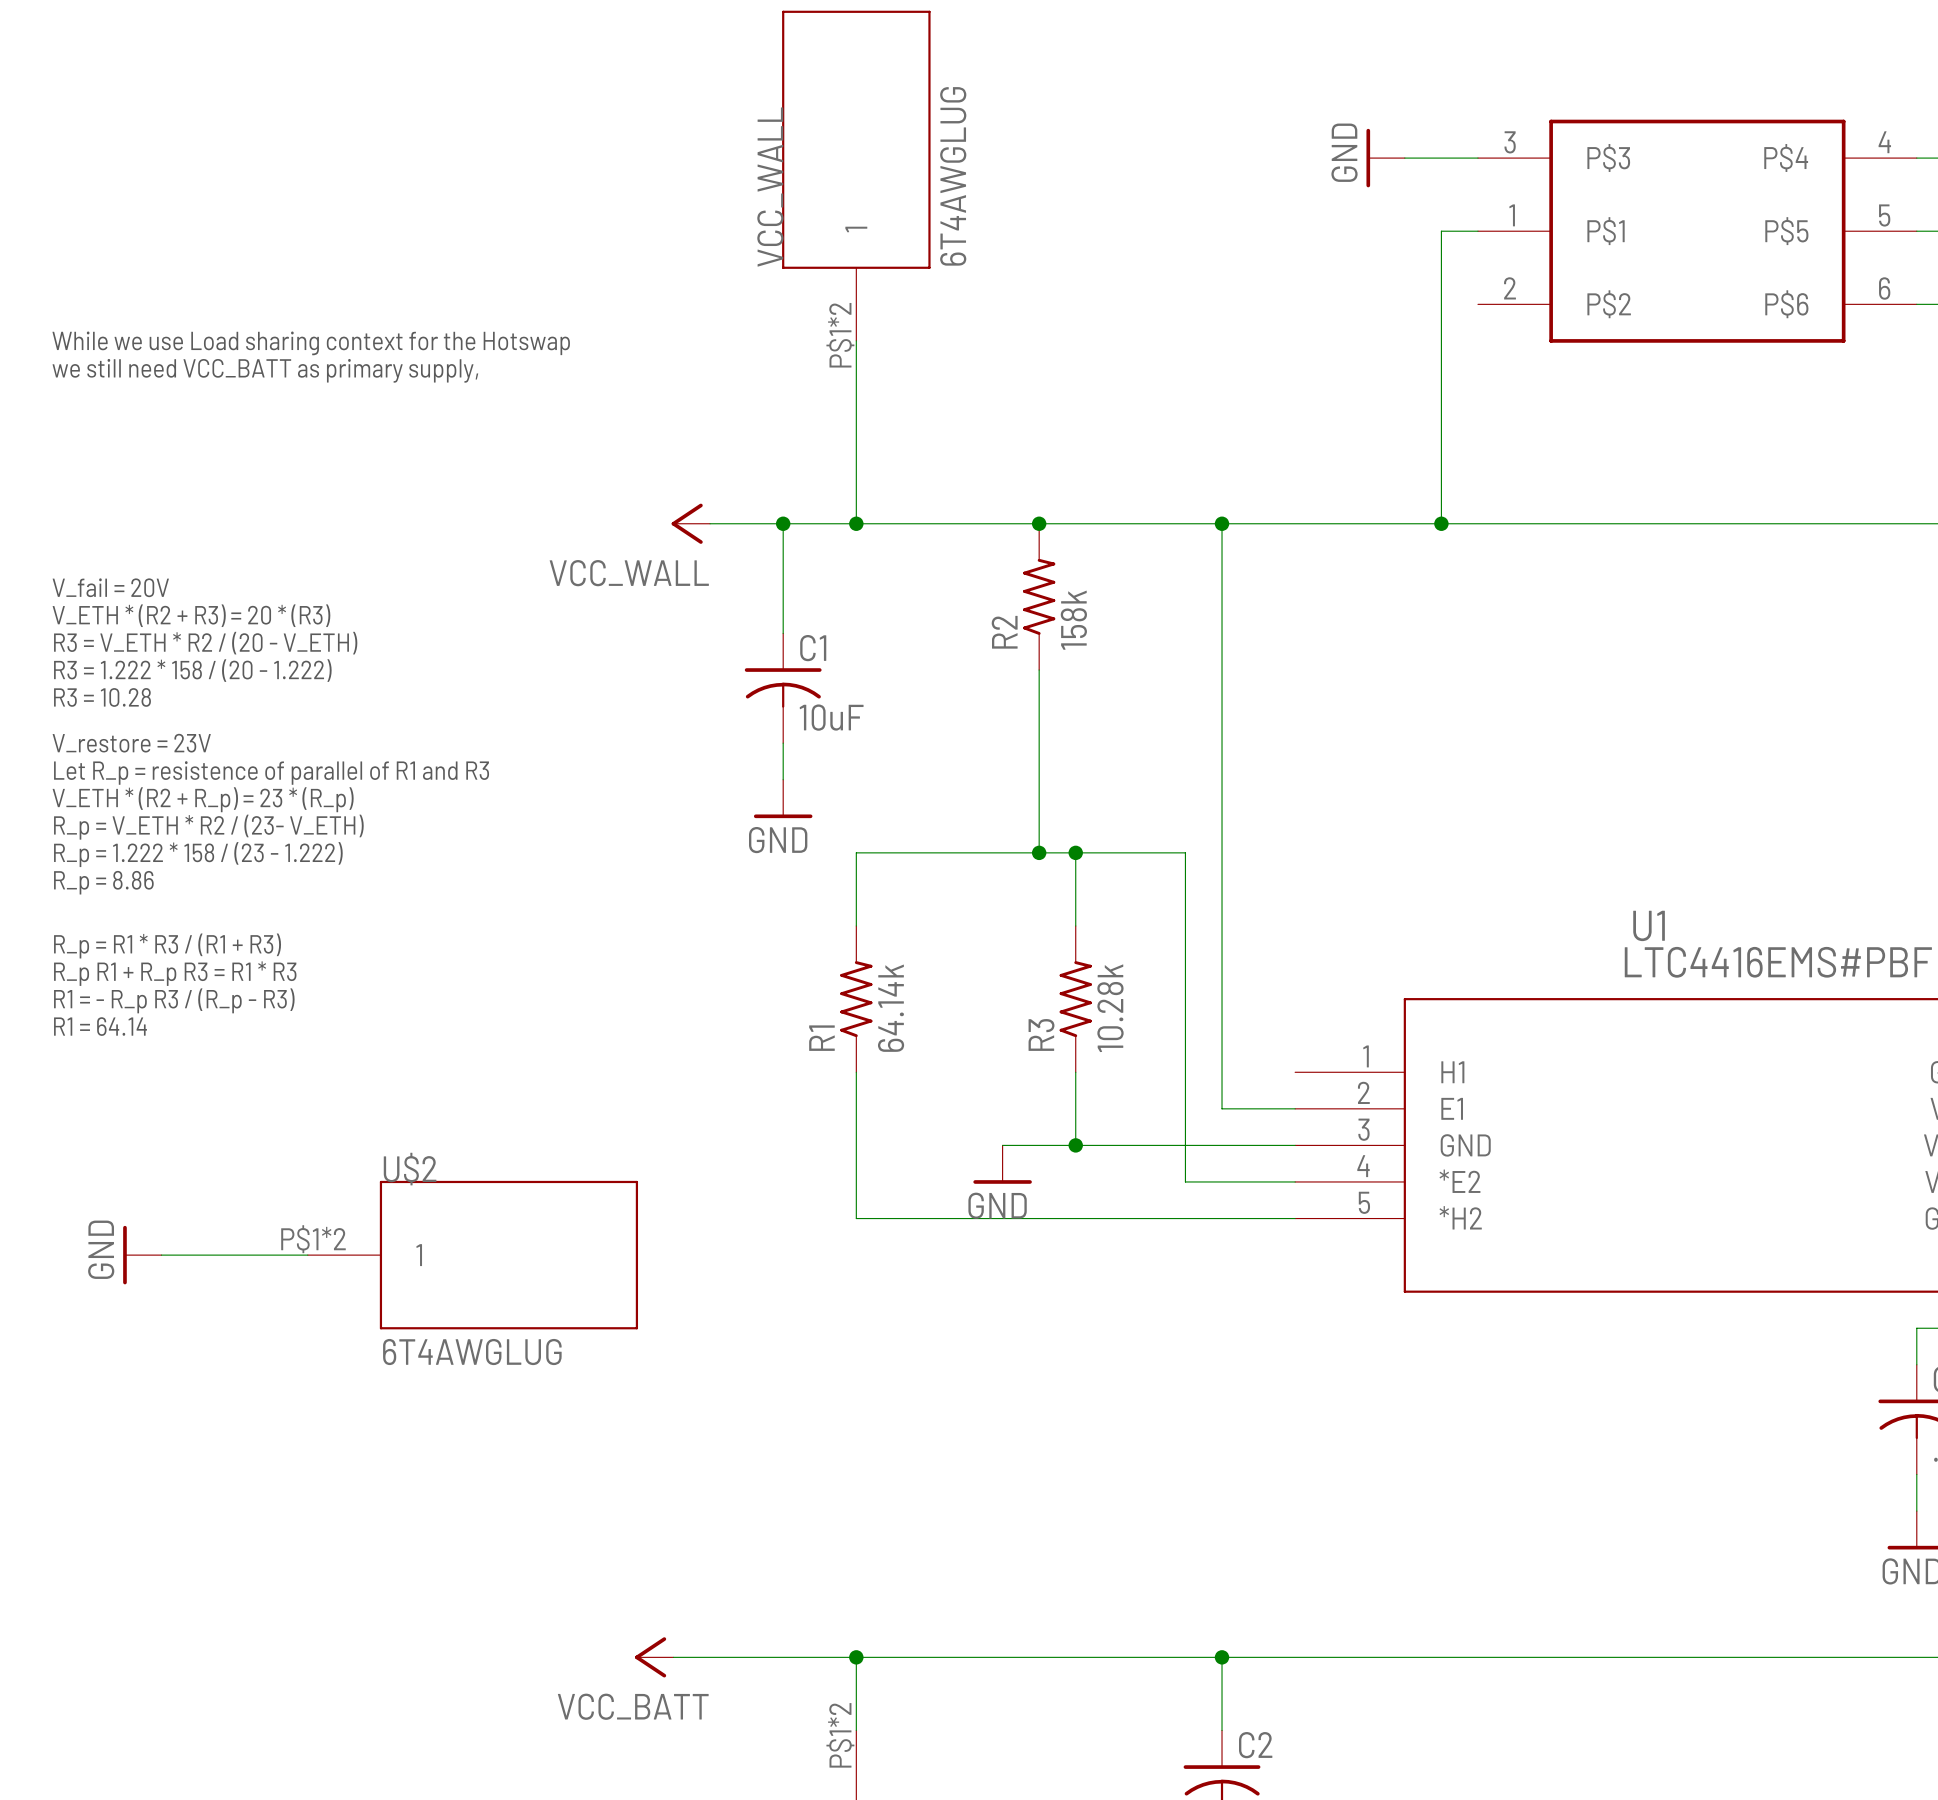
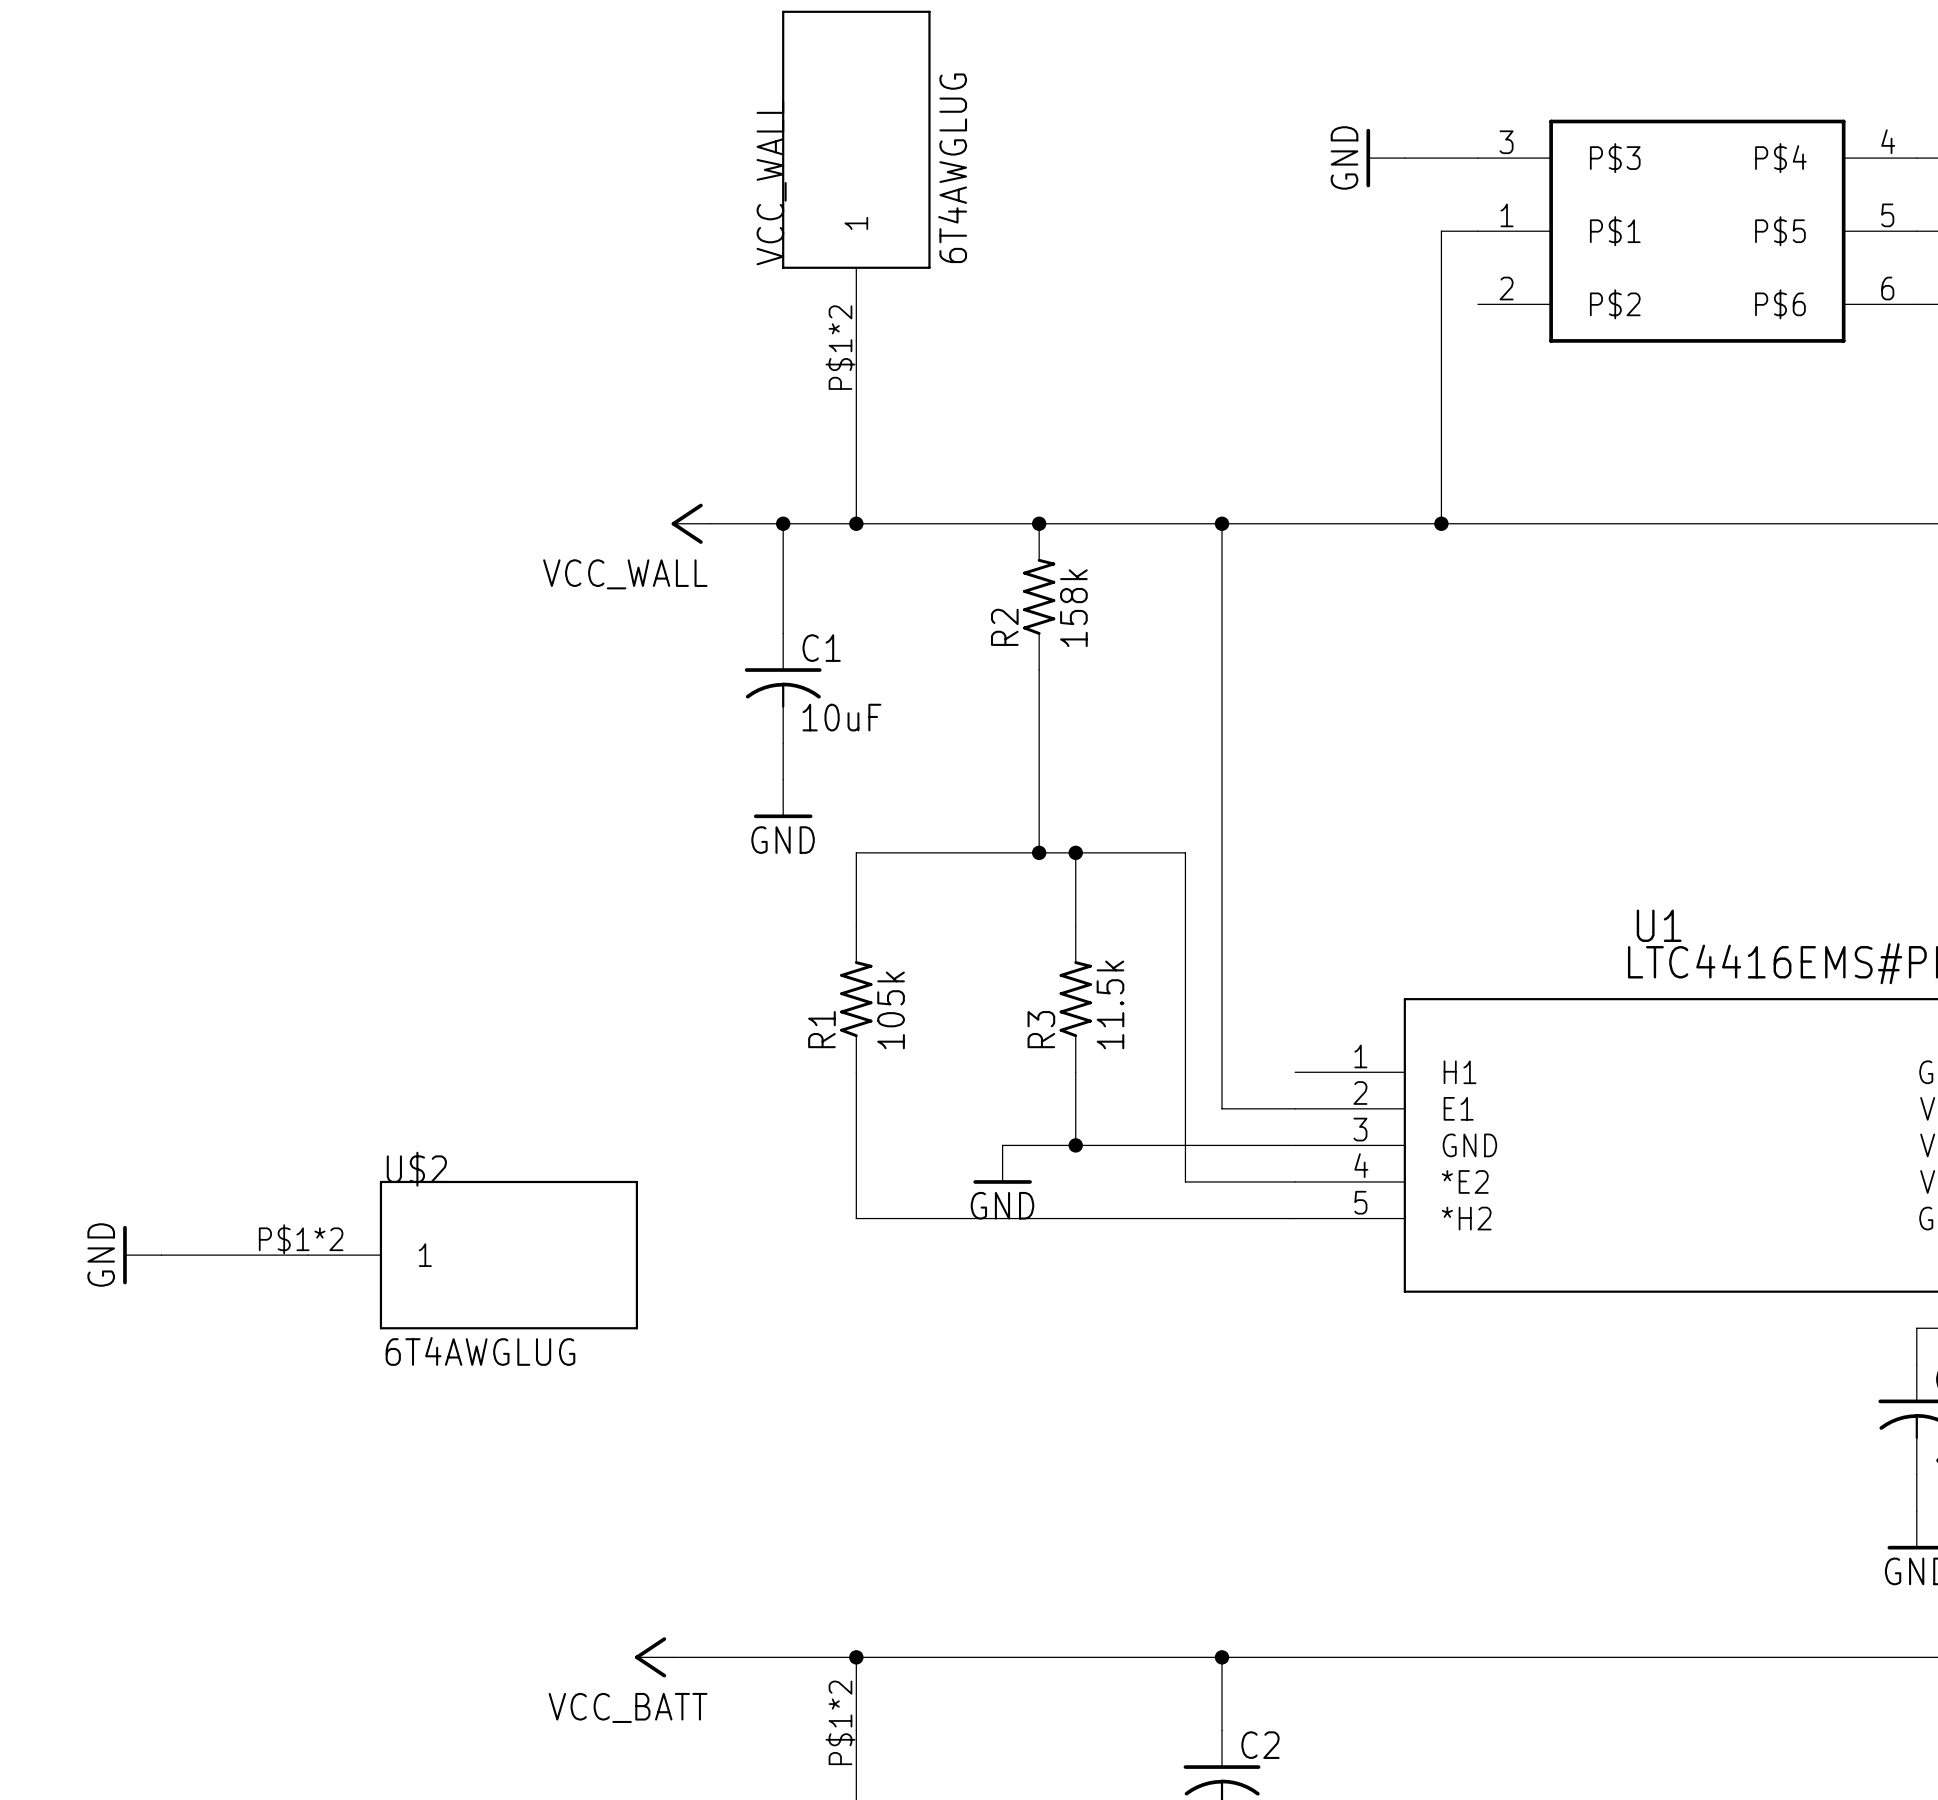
text: While we use Load sharing context for the Hotswap (311, 343) -> none
text: we still need VCC_BATT as primary supply, (265, 370) -> none
text: V_fail = 20V (110, 587) -> none
text: V_ETH * (R2 + R3) = 20 * (R3) (191, 615) -> none
text: R3 = V_ETH * R2 / (20 - V_ETH) (205, 643) -> none
text: R3 = 1.222 * 158 / (20 - 1.222) (192, 670) -> none
text: R3 = 10.28 (102, 697) -> none
text: V_restore = 23V (131, 743) -> none
text: Let R_p = resistence of parallel of R1 and R3 (271, 772) -> none
text: V_ETH * (R2 + R_p) = 23 * (R_p) (203, 799) -> none
text: R_p = V_ETH * R2 / (23- V_ETH) (208, 827) -> none
text: R_p = 1.222 * 158 / (23 - 1.222) (198, 854) -> none
text: R_p = 8.86 (103, 882) -> none
text: R_p = R1 * R3 / (R1 + R3) (167, 946) -> none
text: R_p R1 + R_p R3 = R1 * R3 (175, 973) -> none
text: R1 = - R_p R3 / (R_p - R3) (174, 1000) -> none
R1 value: 64.14k (891, 1008) -> 105k (891, 1010)
R3 value: 10.28k (1110, 1008) -> 11.5k (1110, 1004)
text: R1 = 64.14 (100, 1026) -> none

